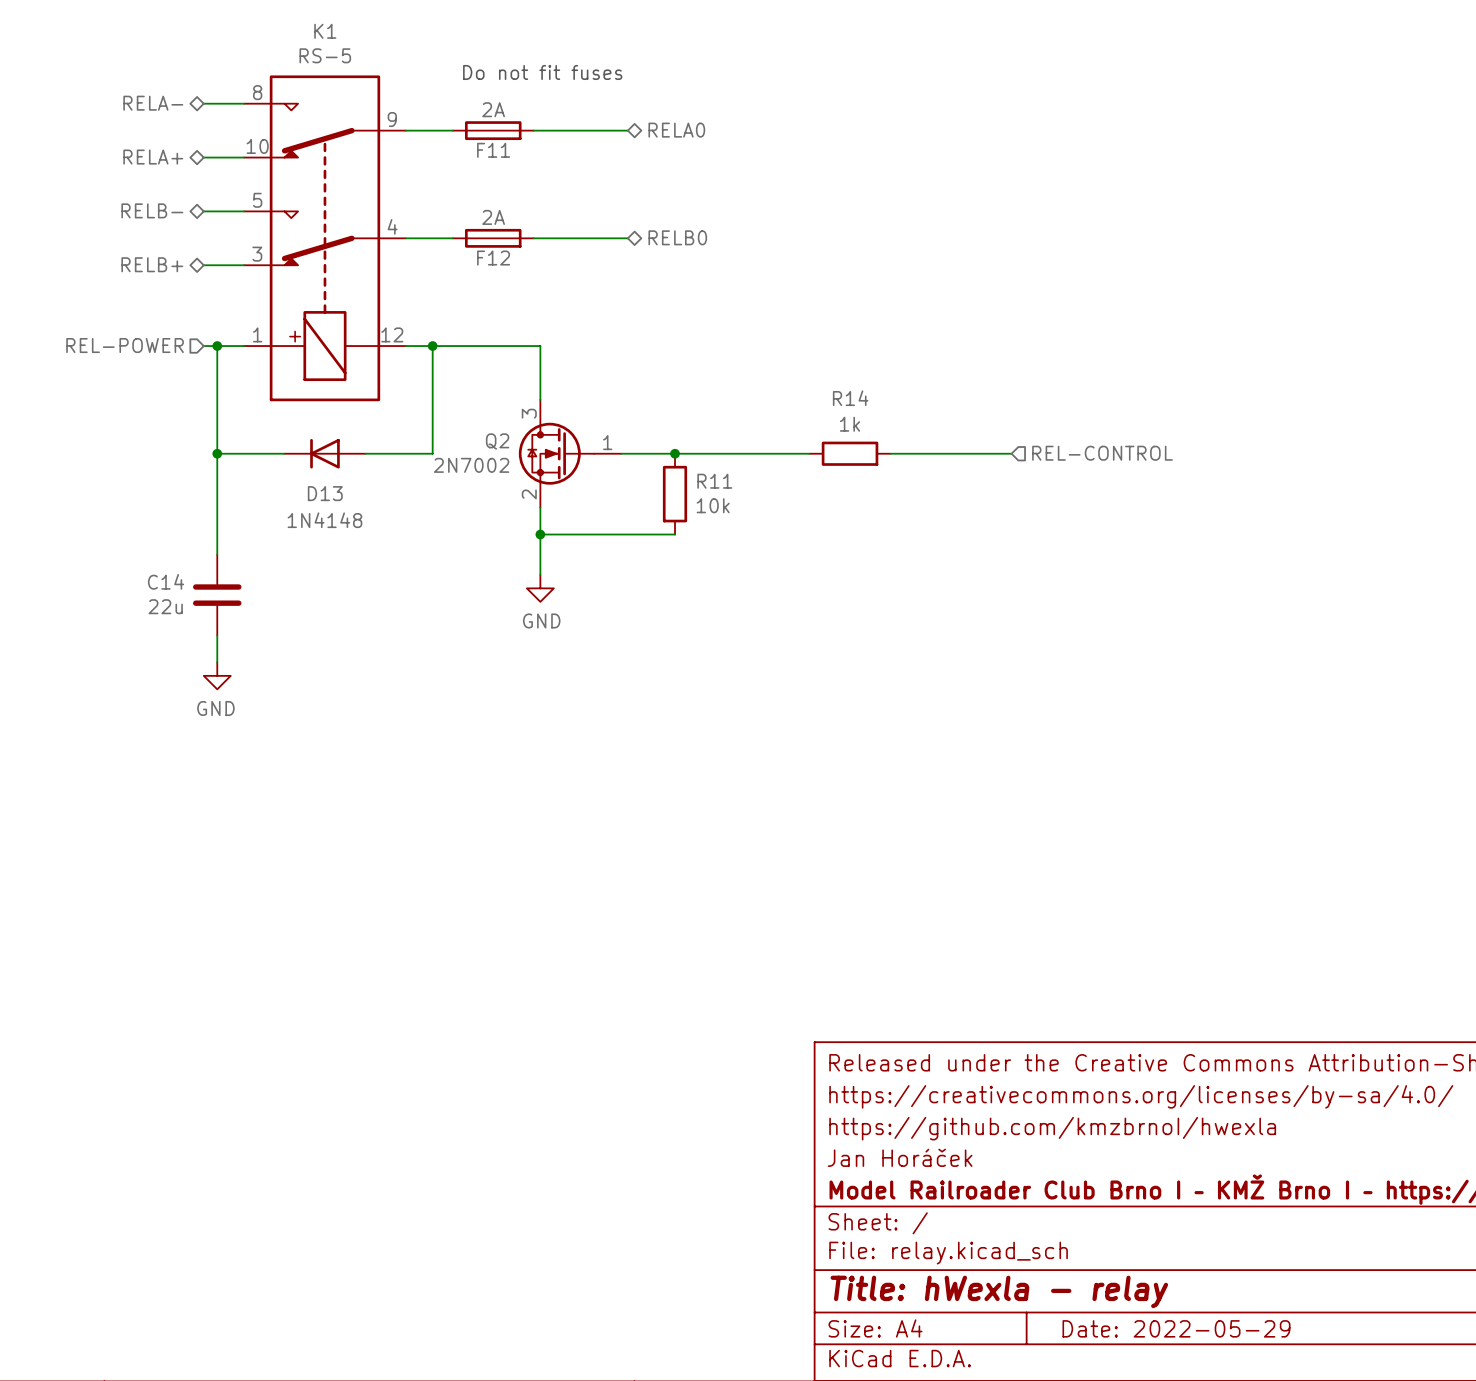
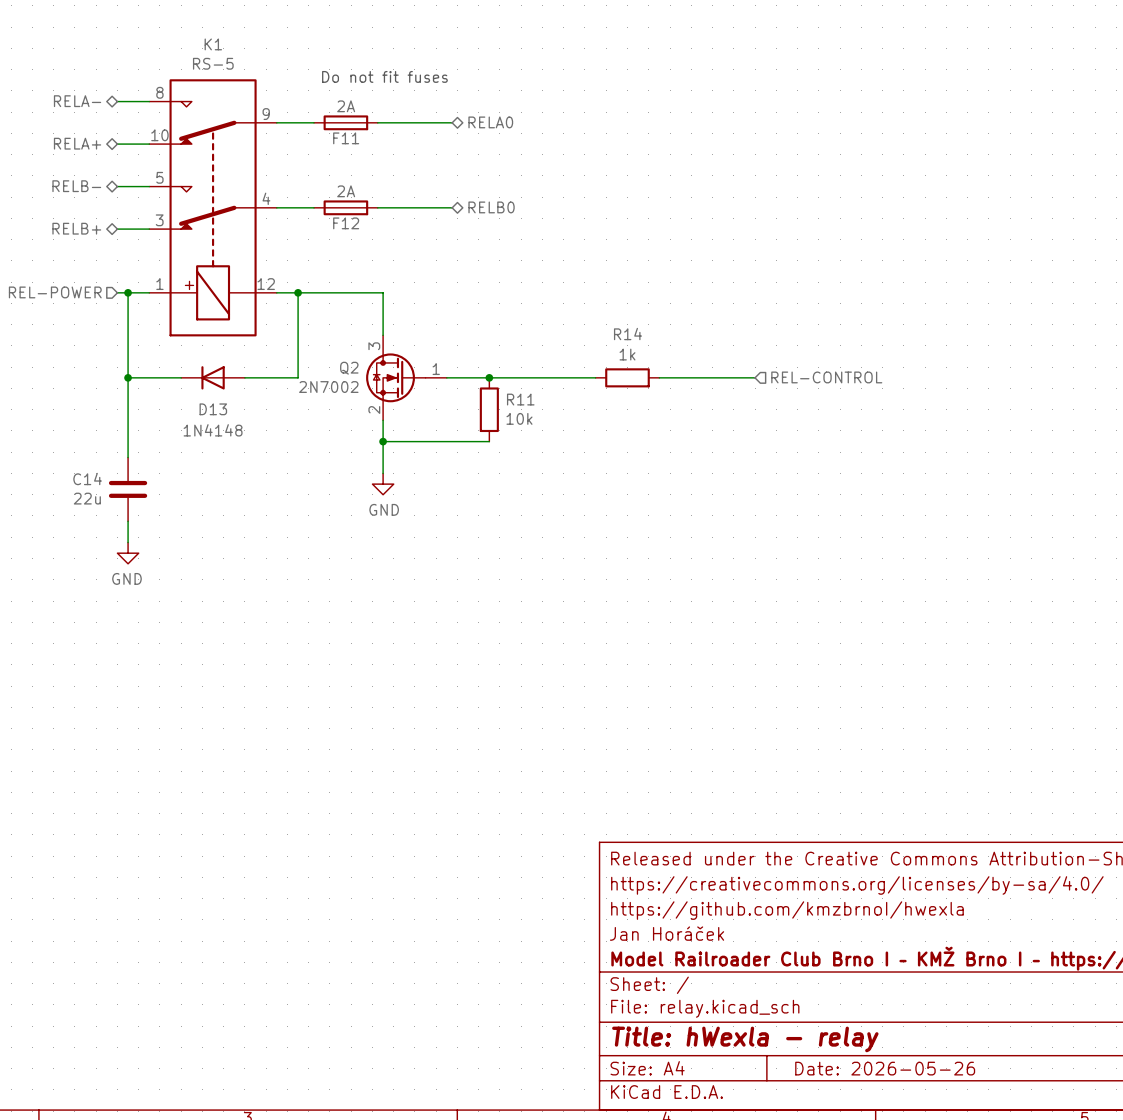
title block: Date: 2022-05-29 (1176, 1328) -> Date: 2026-05-26 (885, 1068)

